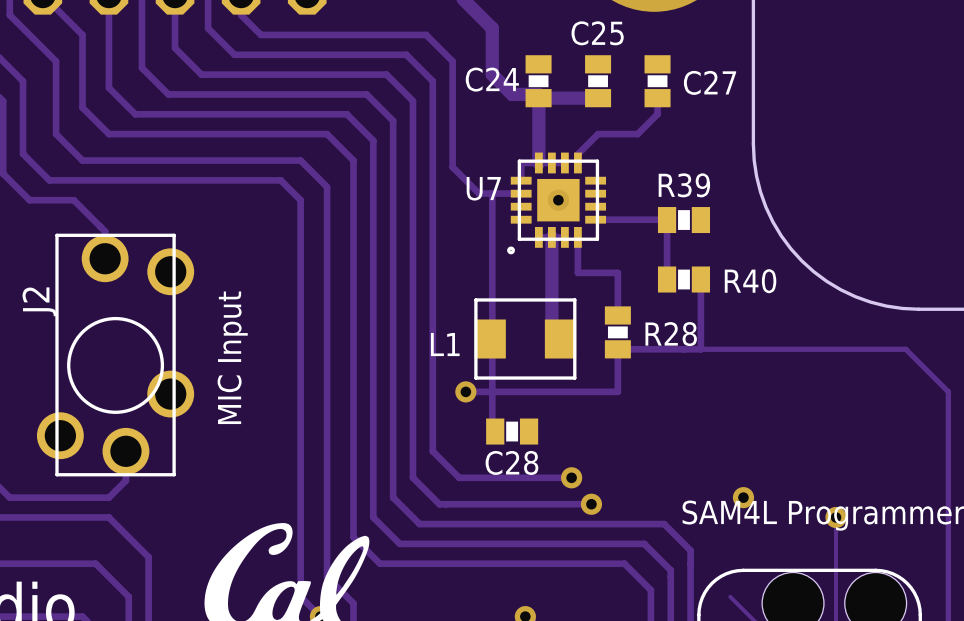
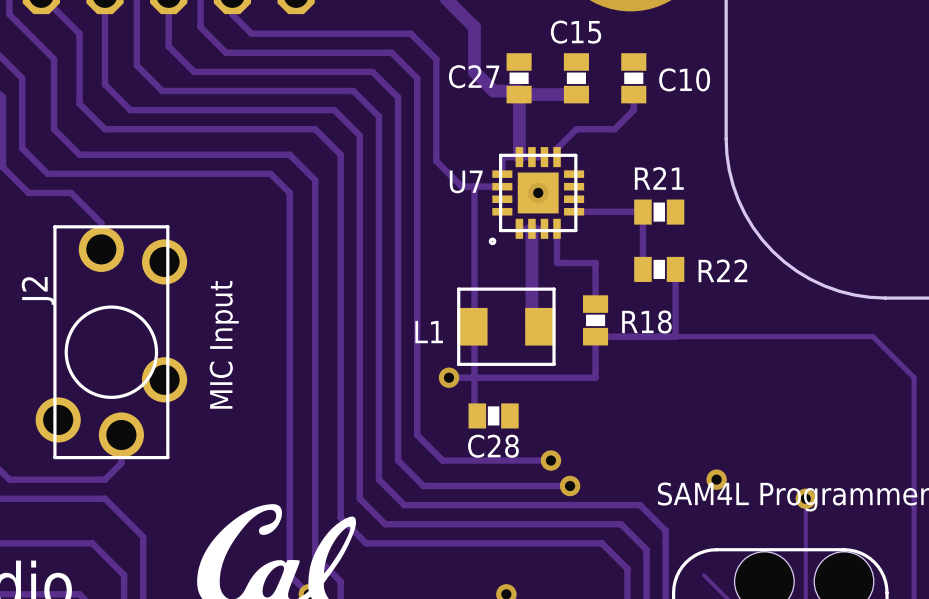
C25 name: C25 (597, 33) -> C15 (576, 32)
C24 name: C24 (492, 79) -> C27 (474, 76)
C27 name: C27 (710, 82) -> C10 (684, 79)
R39 name: R39 (684, 185) -> R21 (659, 178)
R40 name: R40 (750, 281) -> R22 (722, 270)
R28 name: R28 (671, 334) -> R18 (646, 321)

